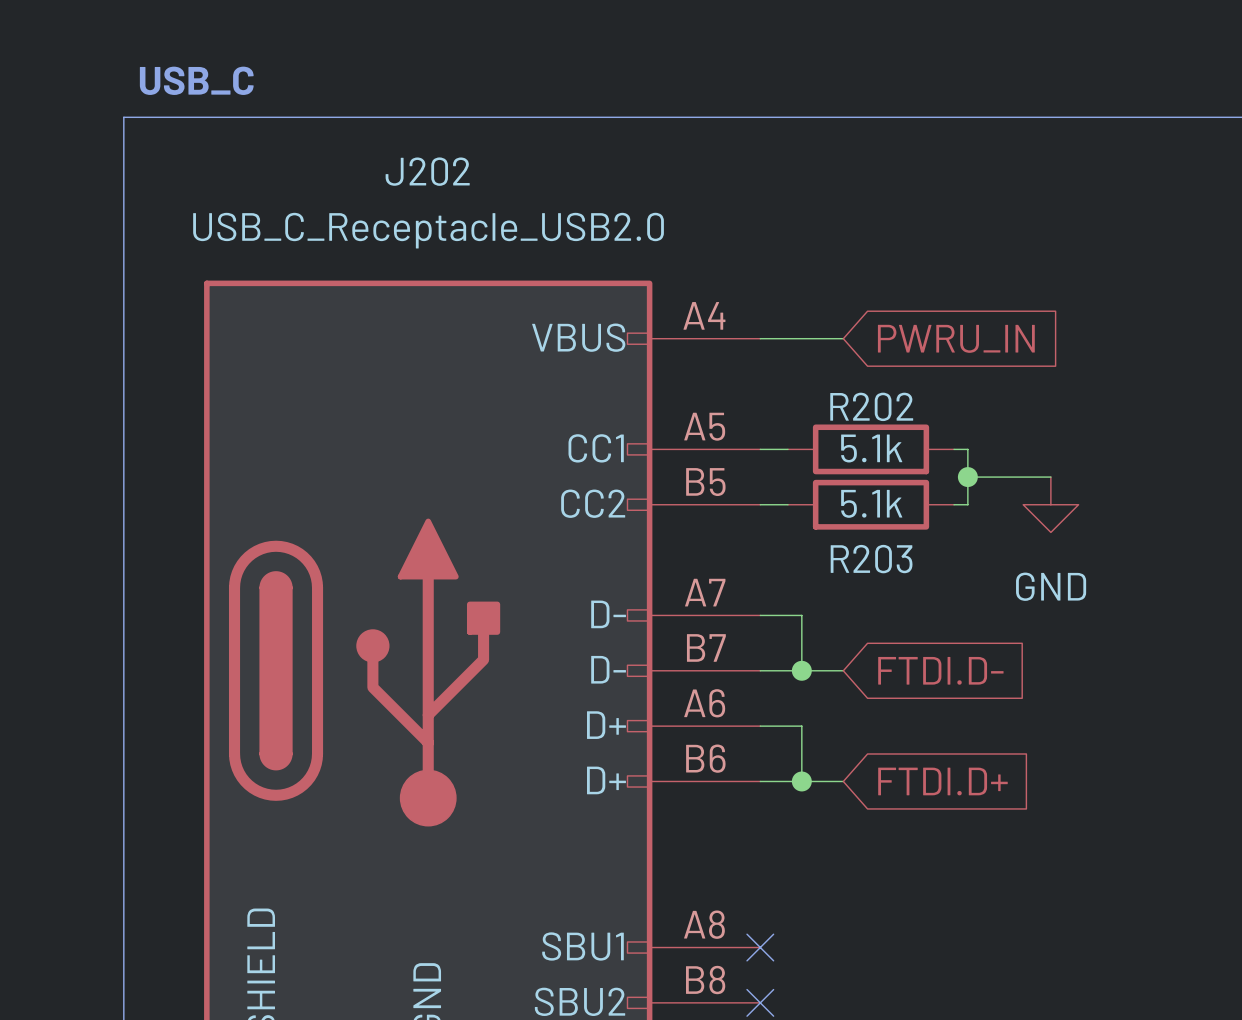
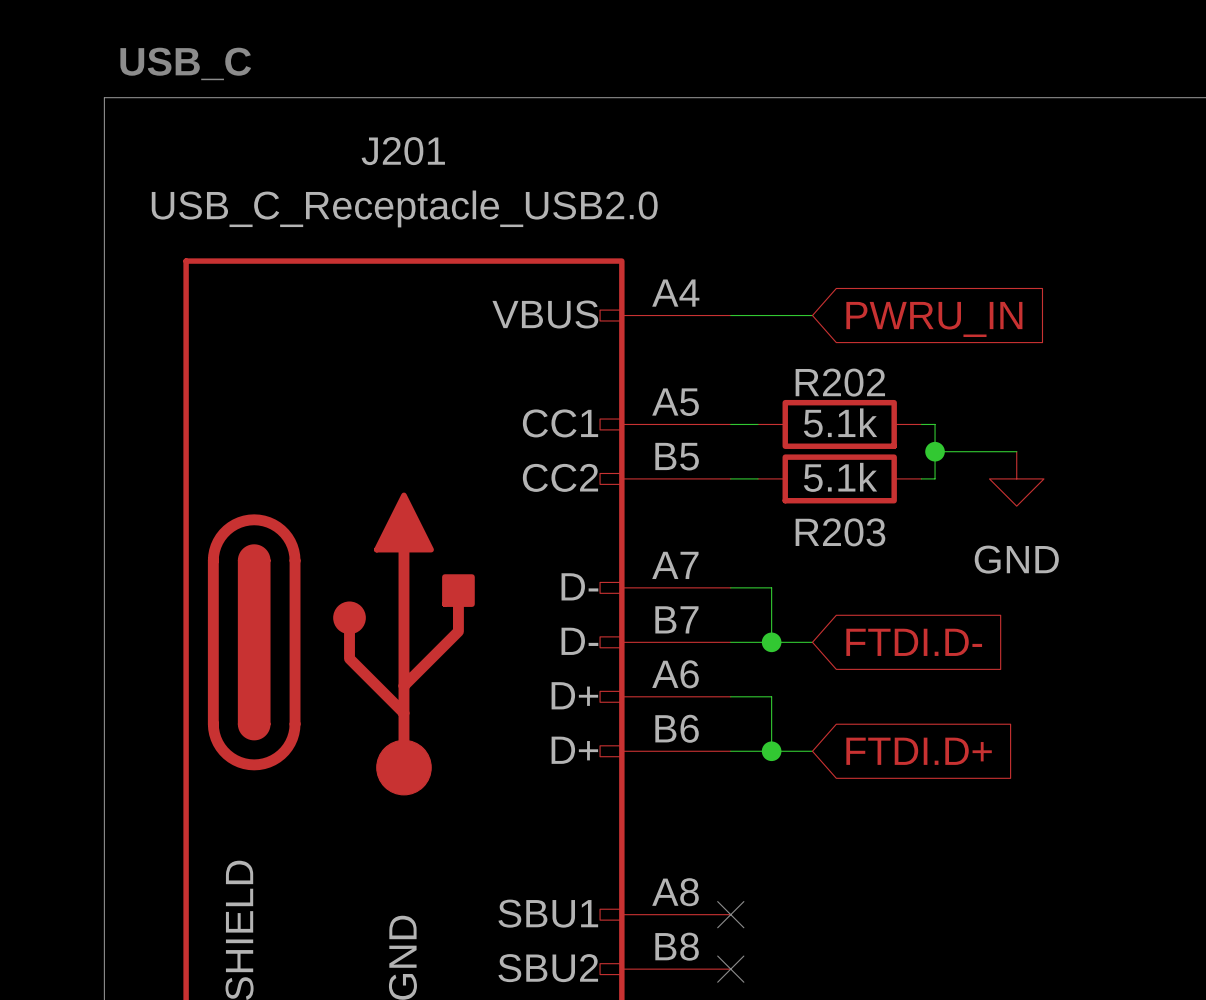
J202 name: J202 (427, 171) -> J201 (403, 151)

